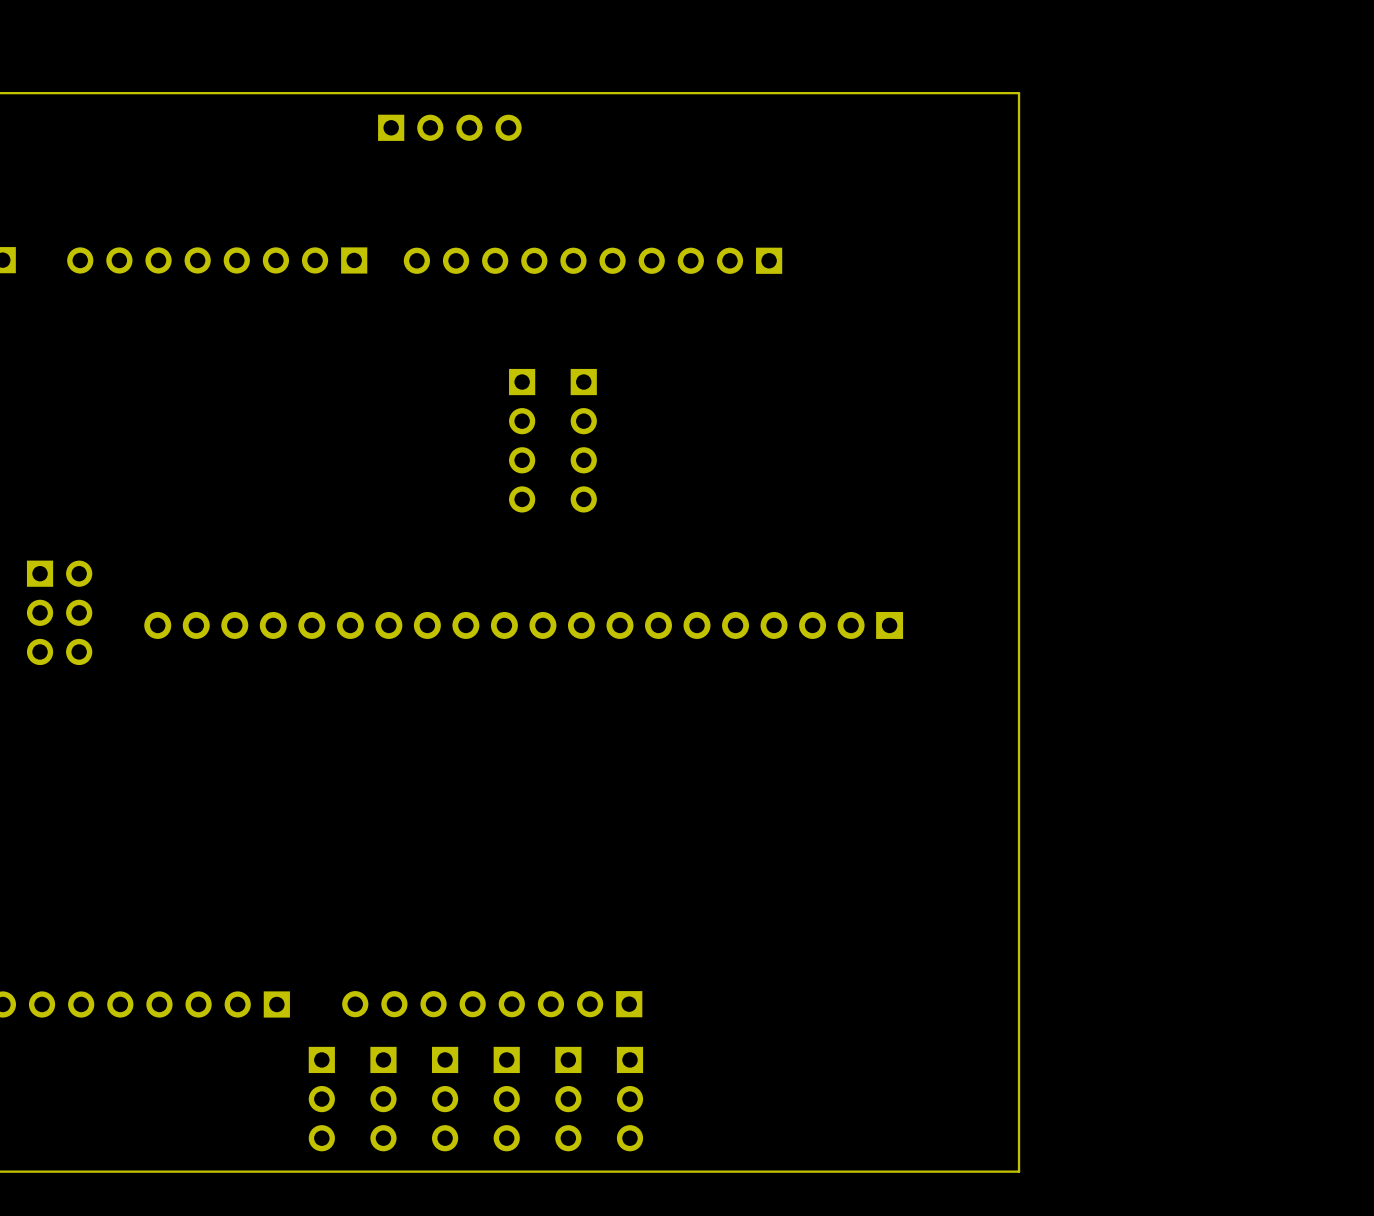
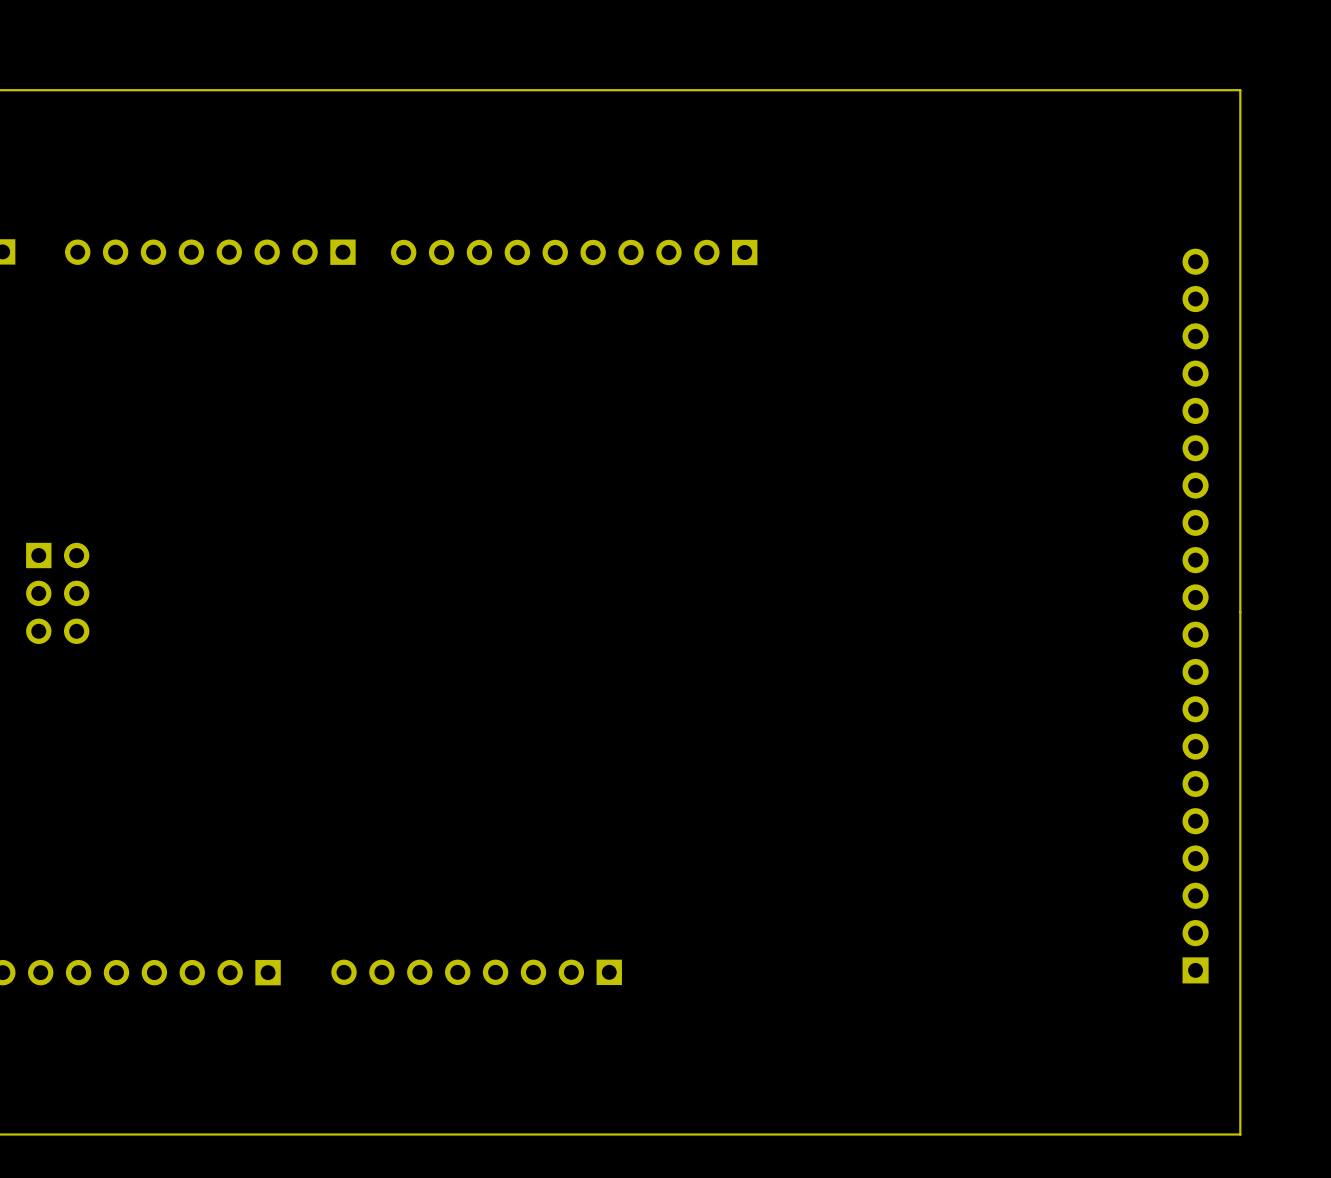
board edge: (1019, 93) (1019, 1171) -> (986, 90) (1240, 90) (1240, 1134) (986, 1134)
part: (449, 127) -> none
part: (522, 440) -> none
part: (583, 440) -> none
part: (523, 625) -> none
part: none -> (1195, 616)
part: (321, 1099) -> none
part: (383, 1099) -> none
part: (445, 1099) -> none
part: (506, 1099) -> none
part: (568, 1099) -> none
part: (629, 1099) -> none

